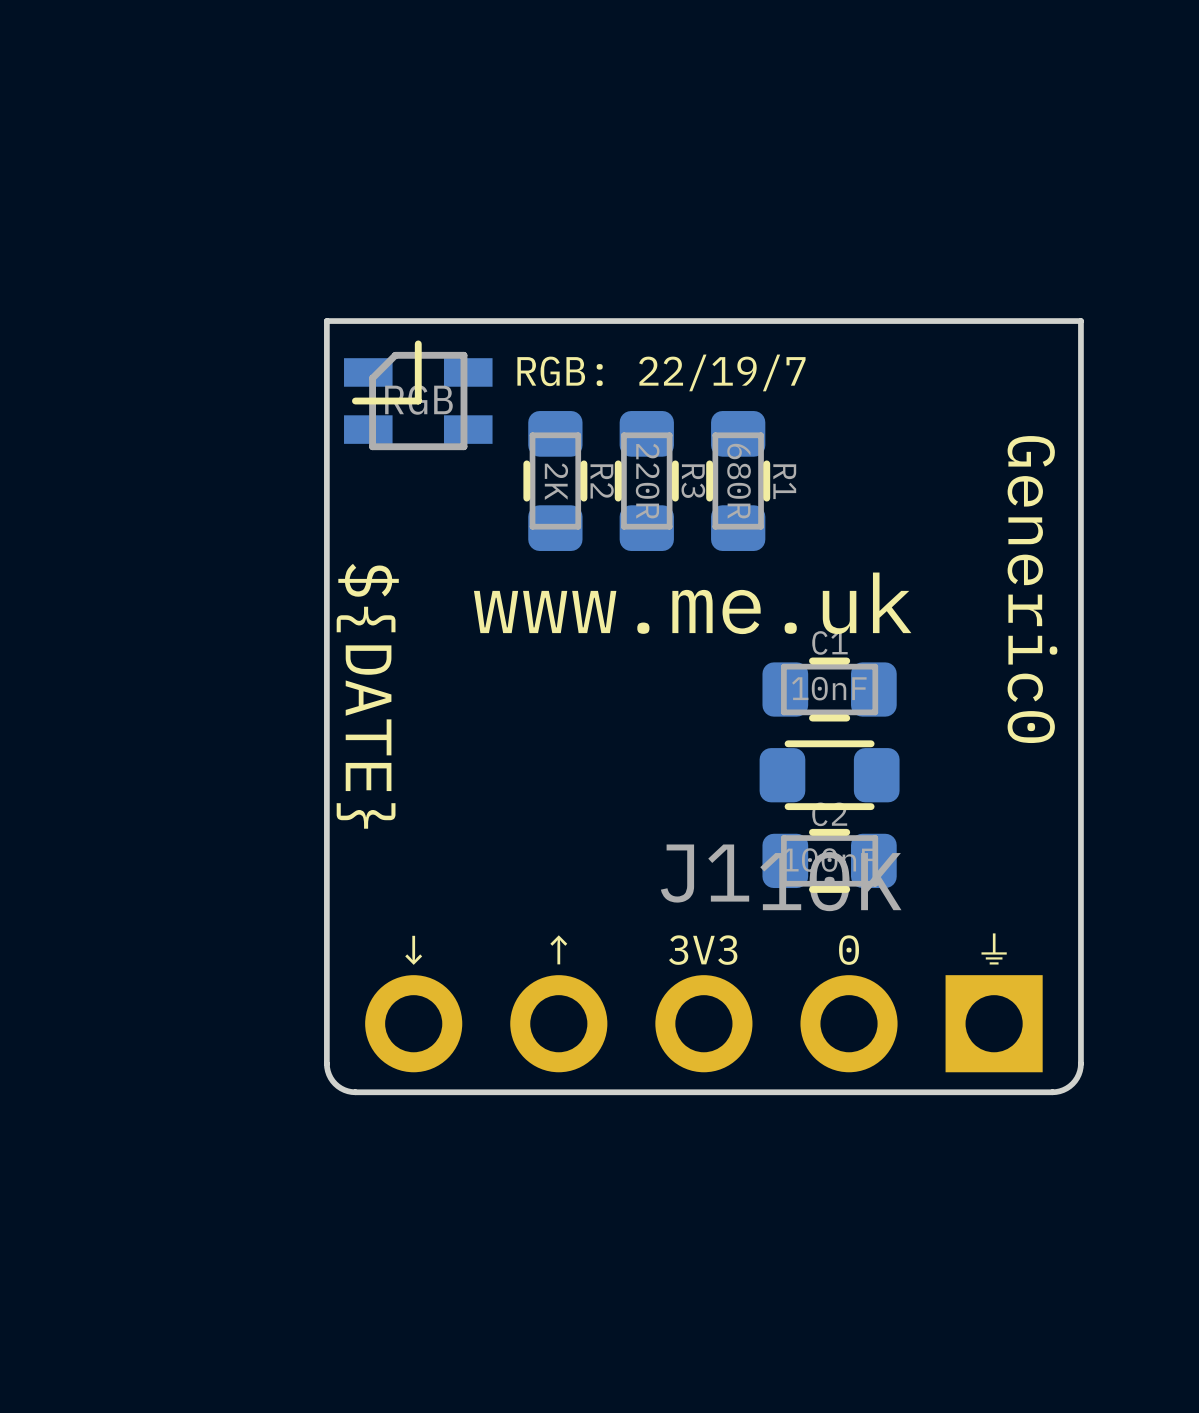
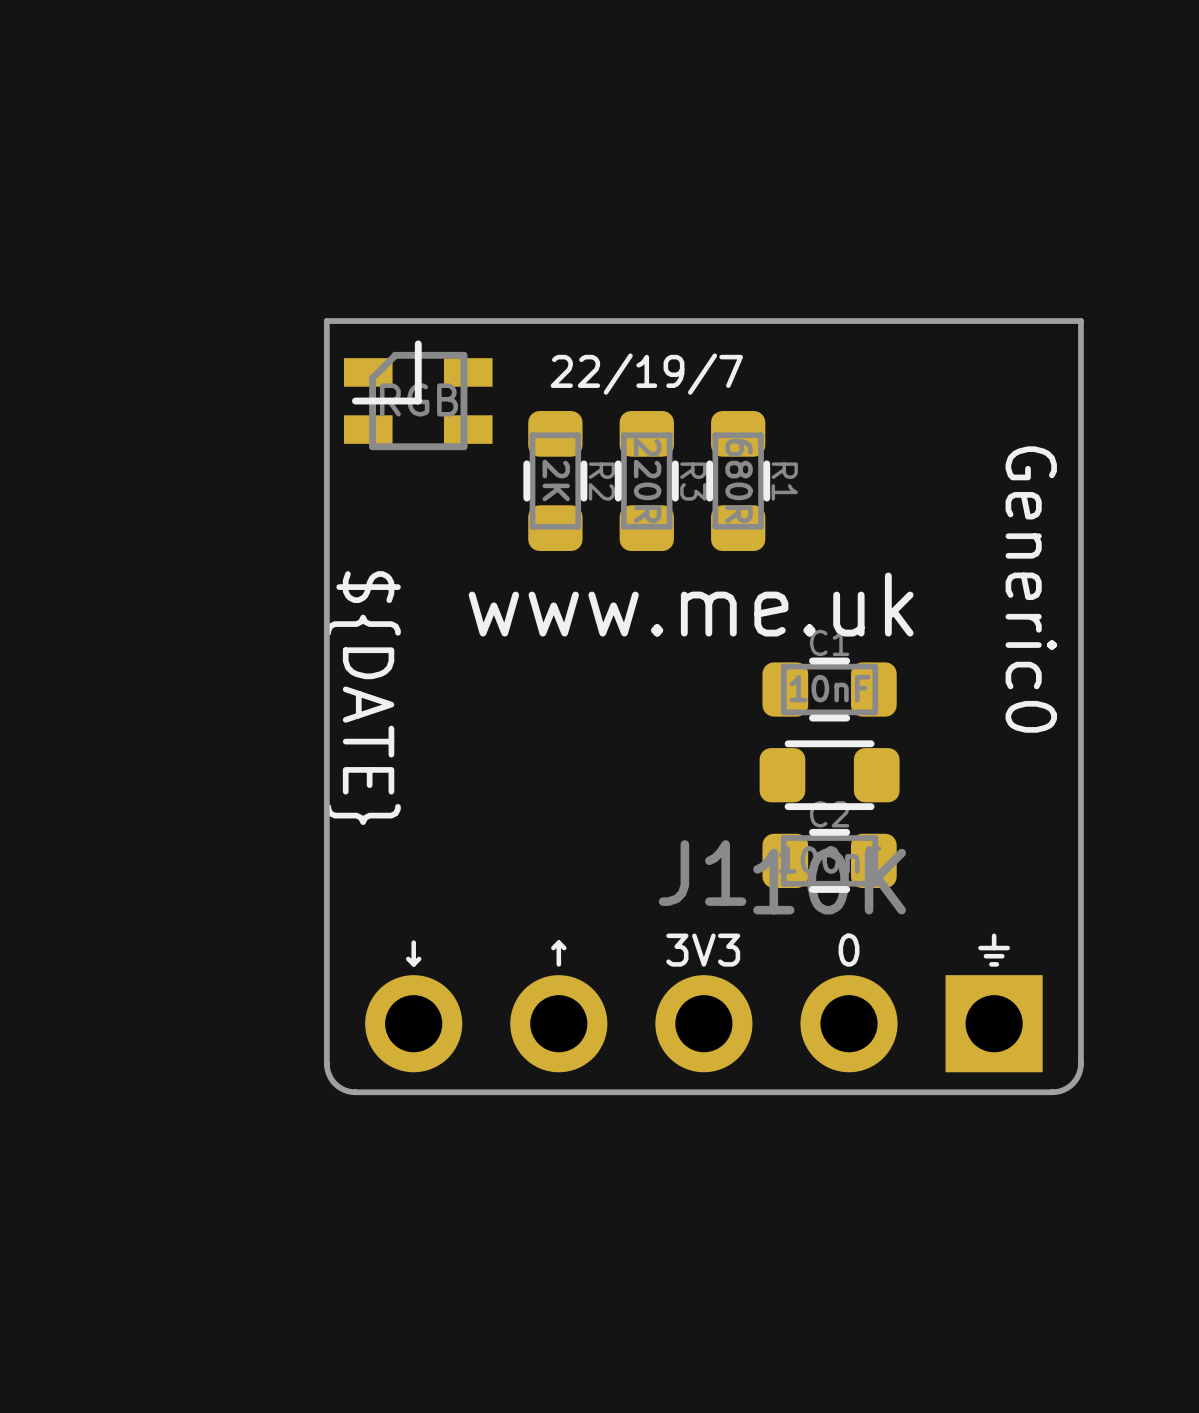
text: RGB: 22/19/7 (661, 372) -> 22/19/7 (646, 374)

